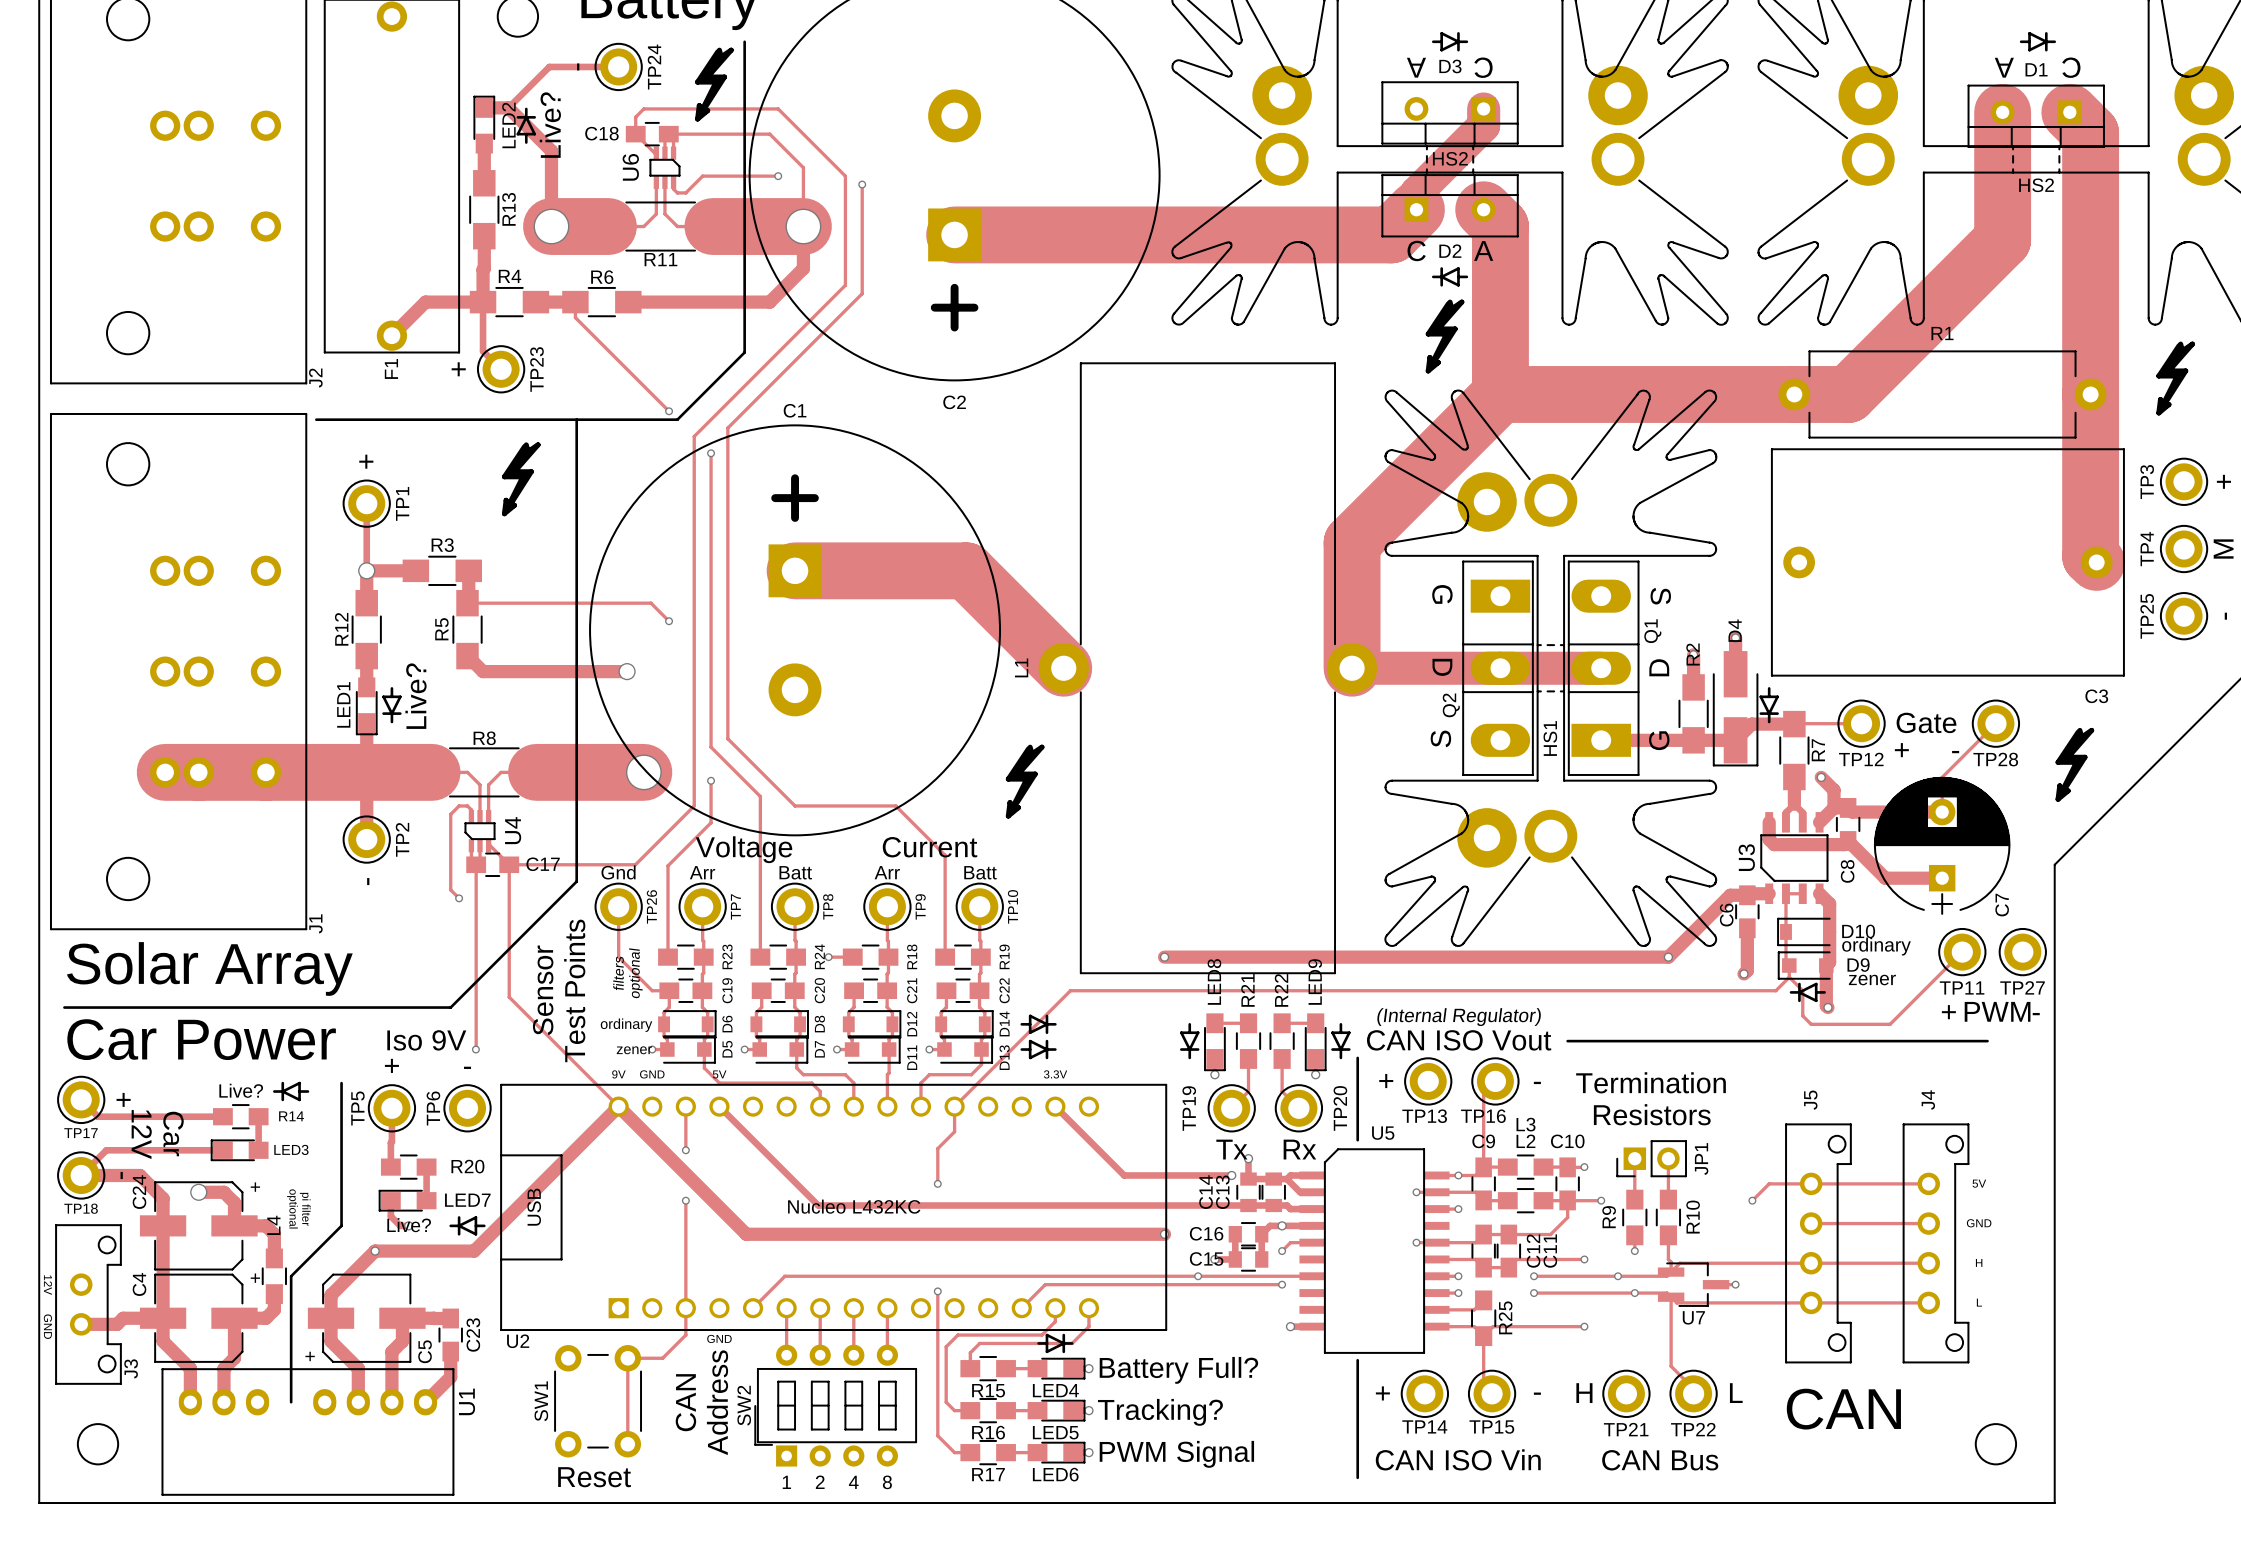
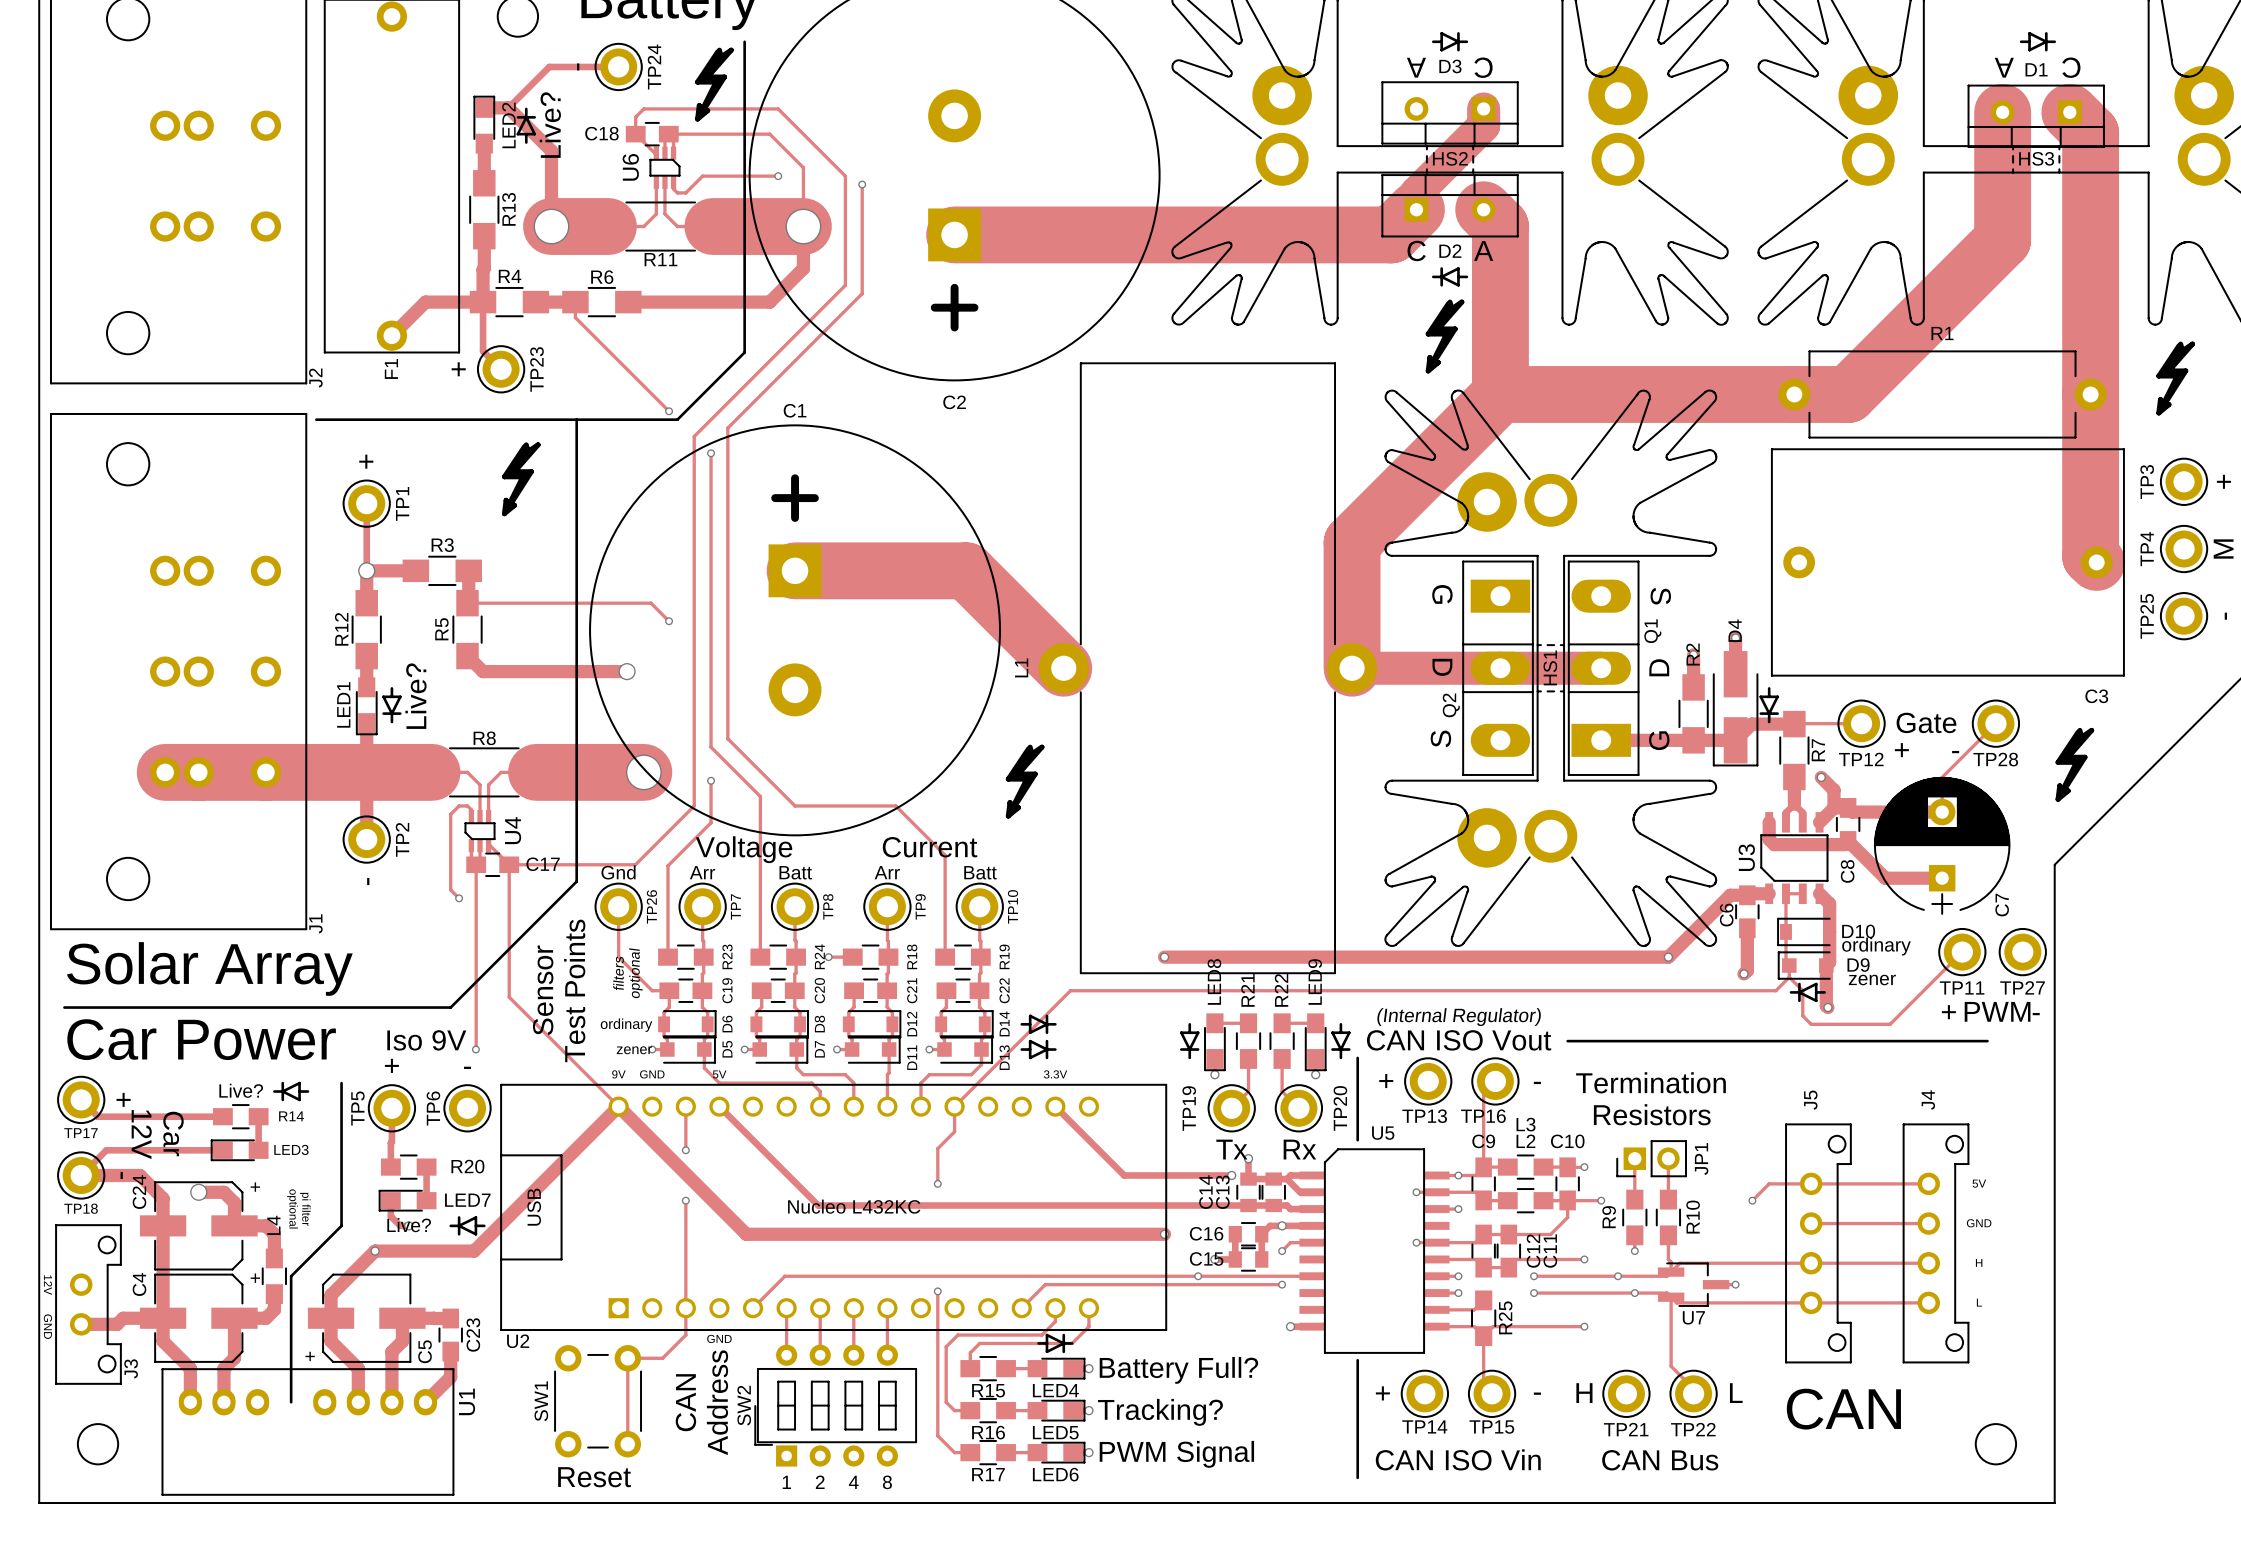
HS2 name: HS2 (2036, 185) -> HS3 (2036, 158)
HS1 name position: HS1 (1550, 738) -> HS1 (1550, 667)

